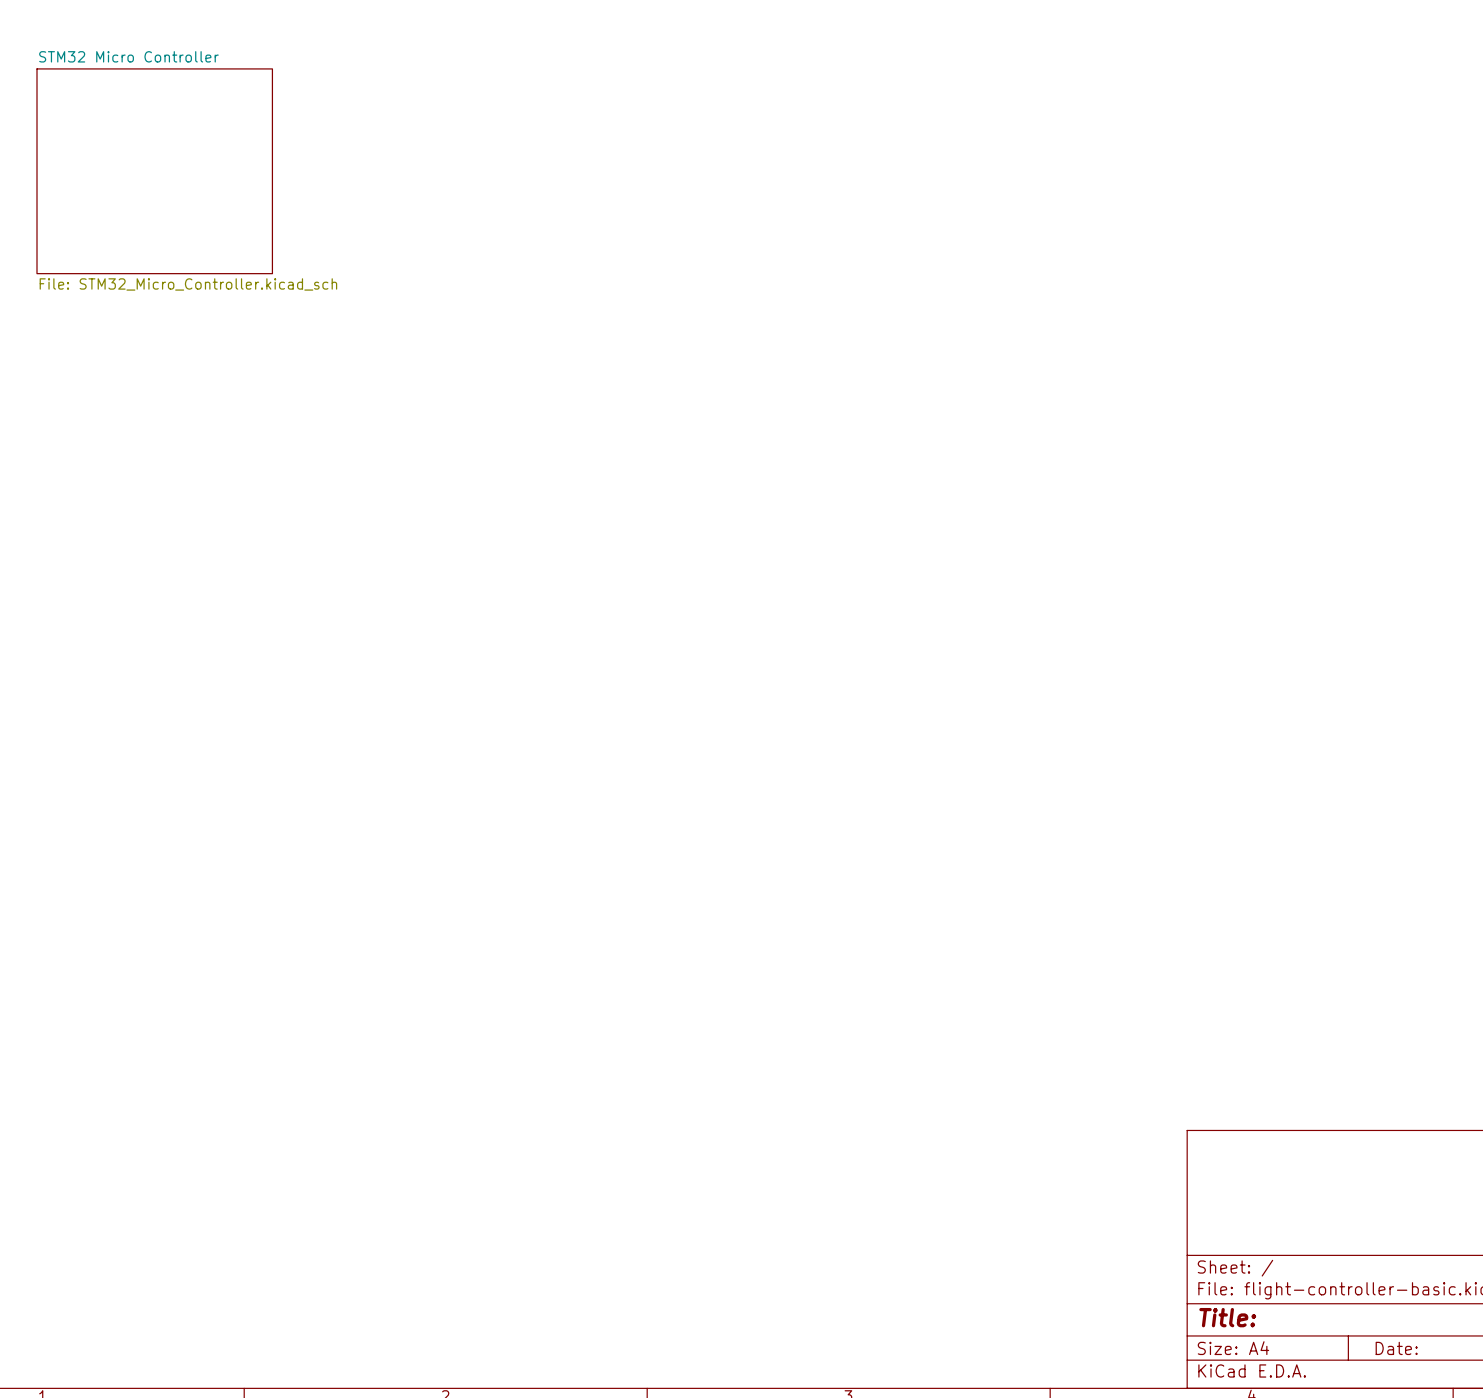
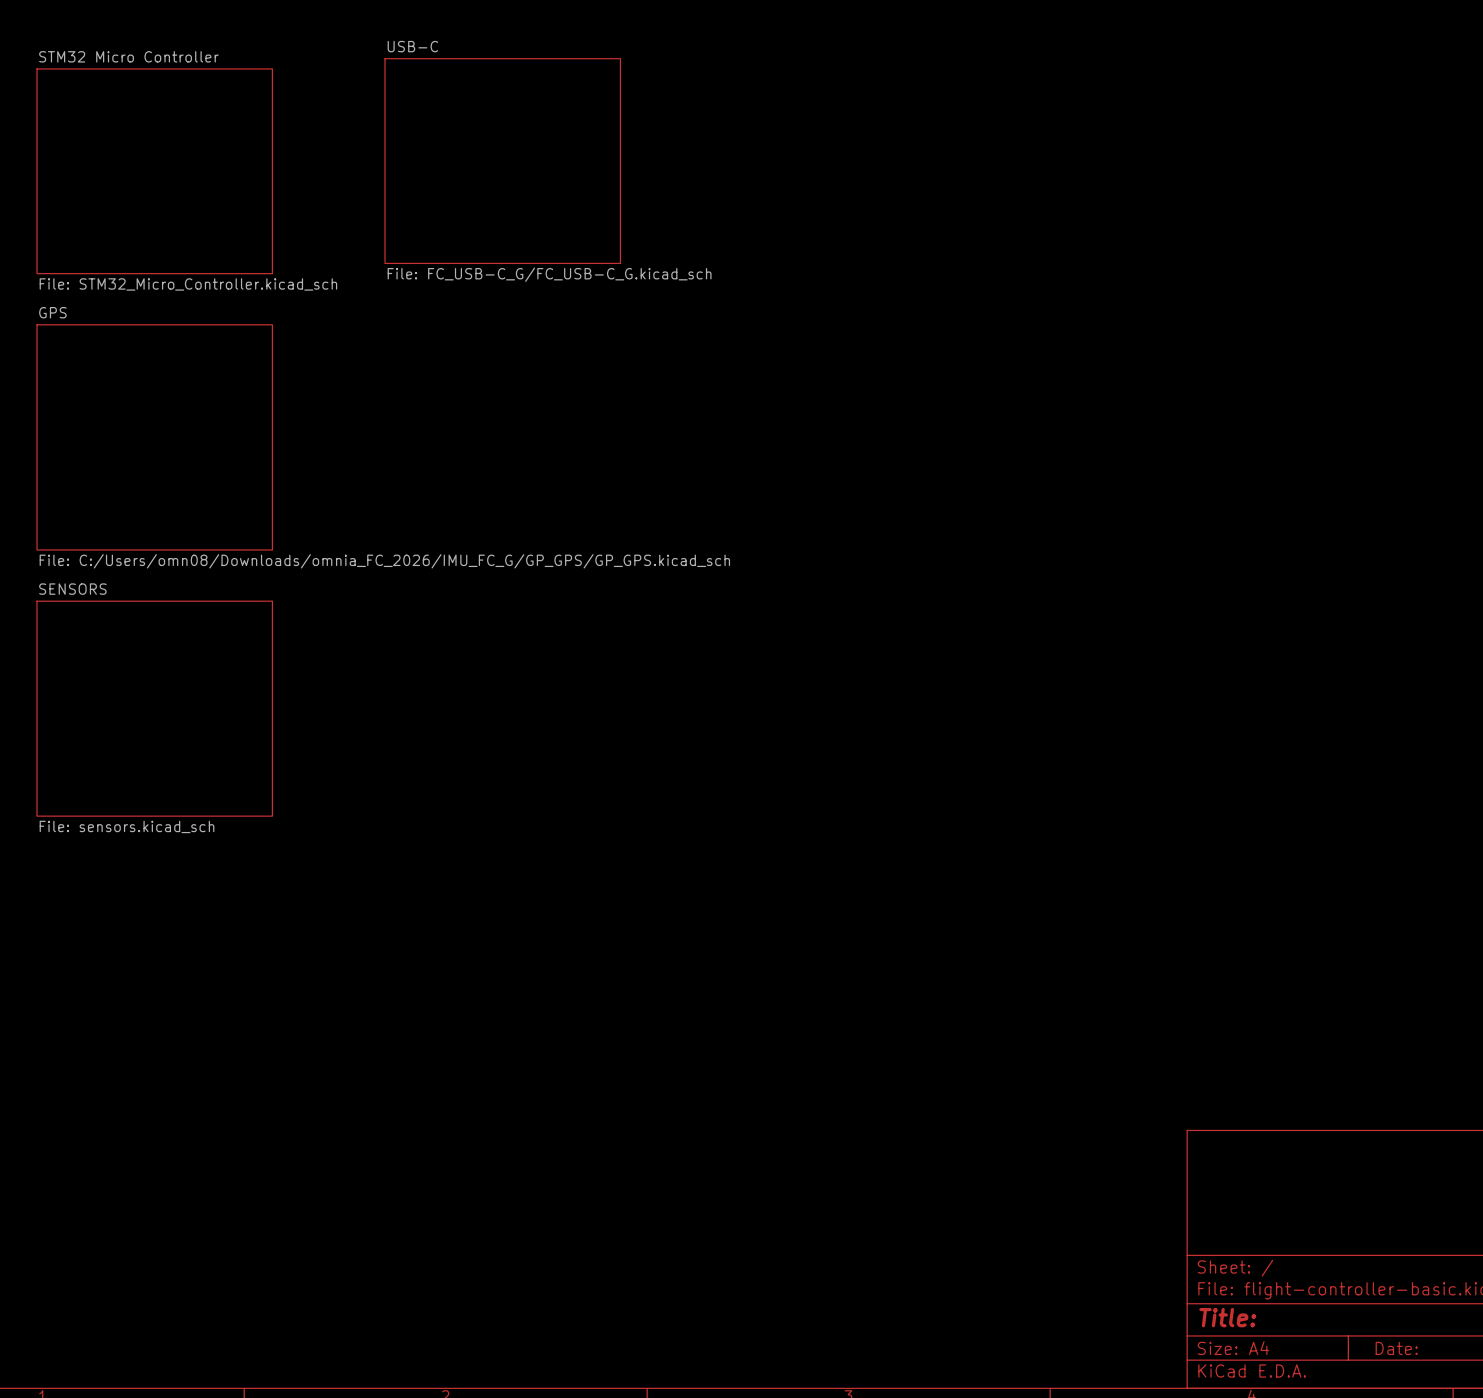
sheet USB-C: none -> File: FC_USB-C_G/FC_USB-C_G.kicad_sch (502, 161)
sheet GPS: none -> File: C:/Users/omn08/Downloads/omnia_FC_2026/IMU_FC_G/GP_GPS/GP_GPS.kicad_sch (154, 437)
sheet SENSORS: none -> File: sensors.kicad_sch (154, 708)

